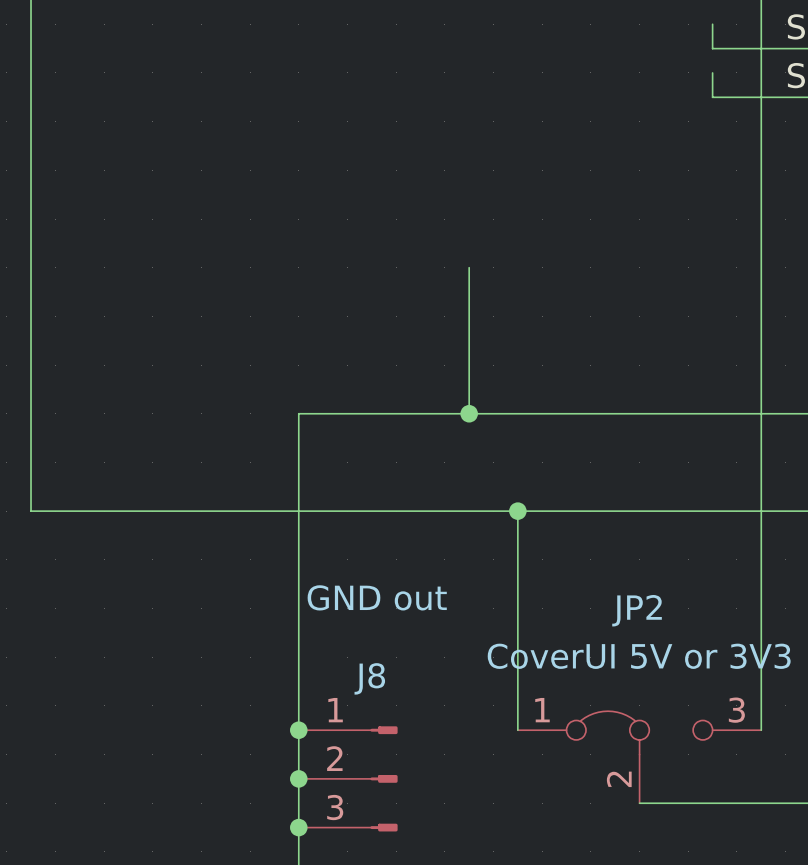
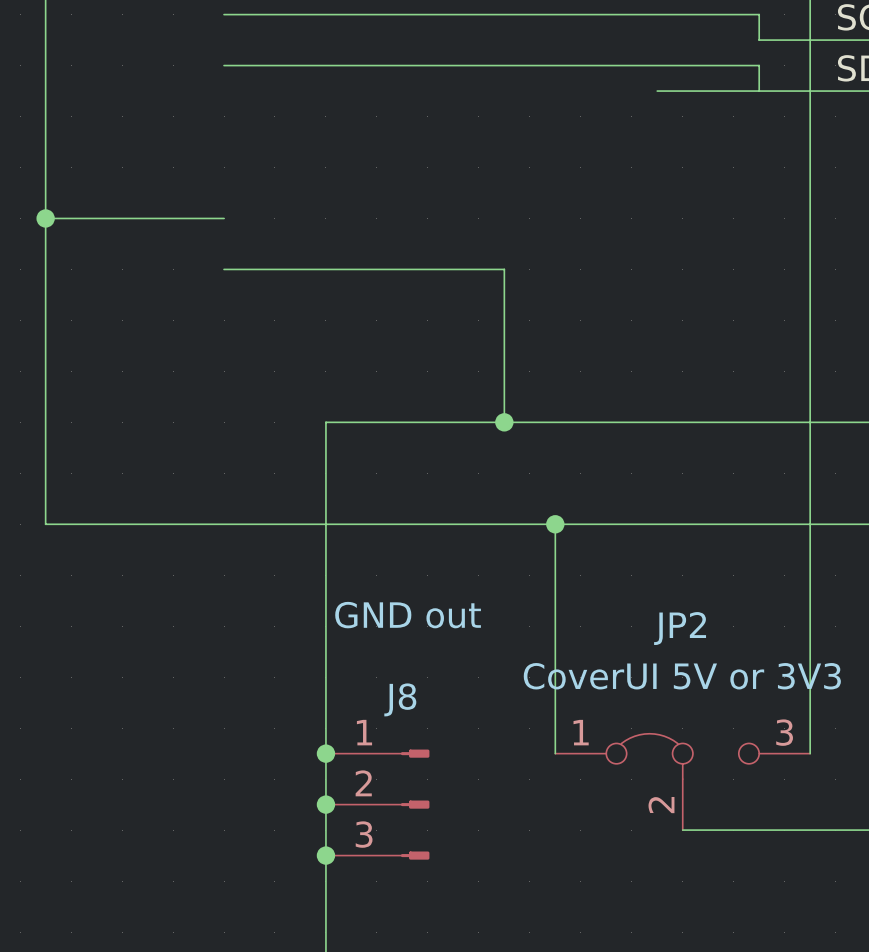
wire: none -> (224, 14) (759, 14)
wire: none -> (224, 65) (759, 65)
wire: none -> (657, 91) (759, 91)
wire: none -> (45, 218) (224, 218)
junction: none -> (45, 218)
wire: none -> (224, 269) (504, 269)

